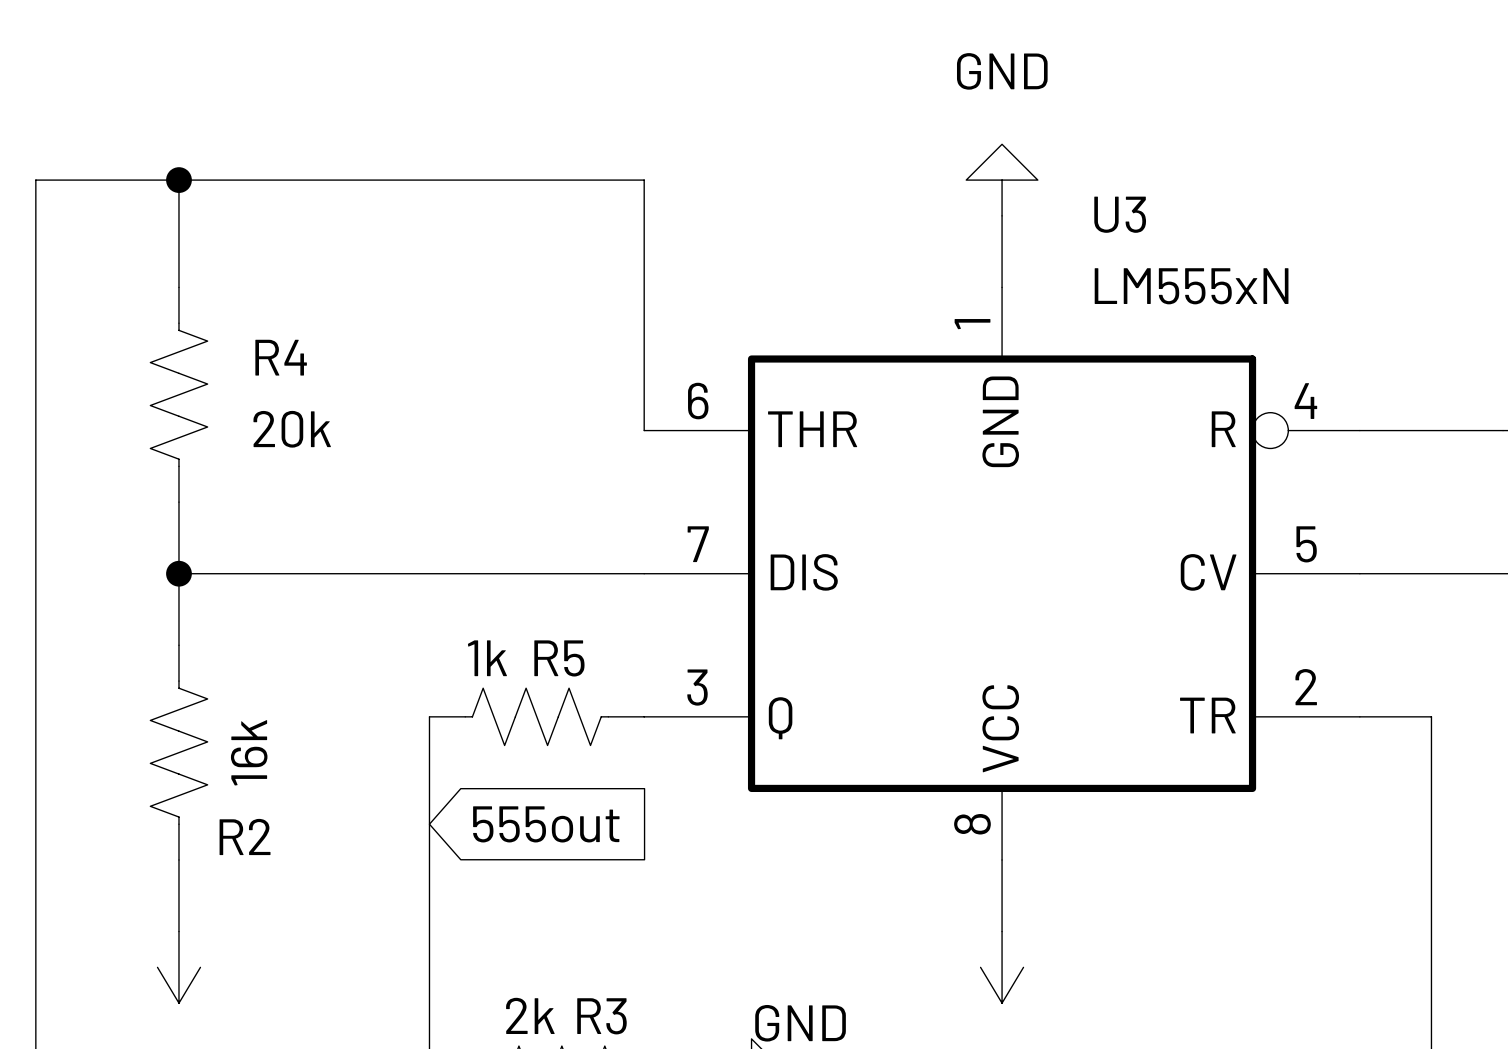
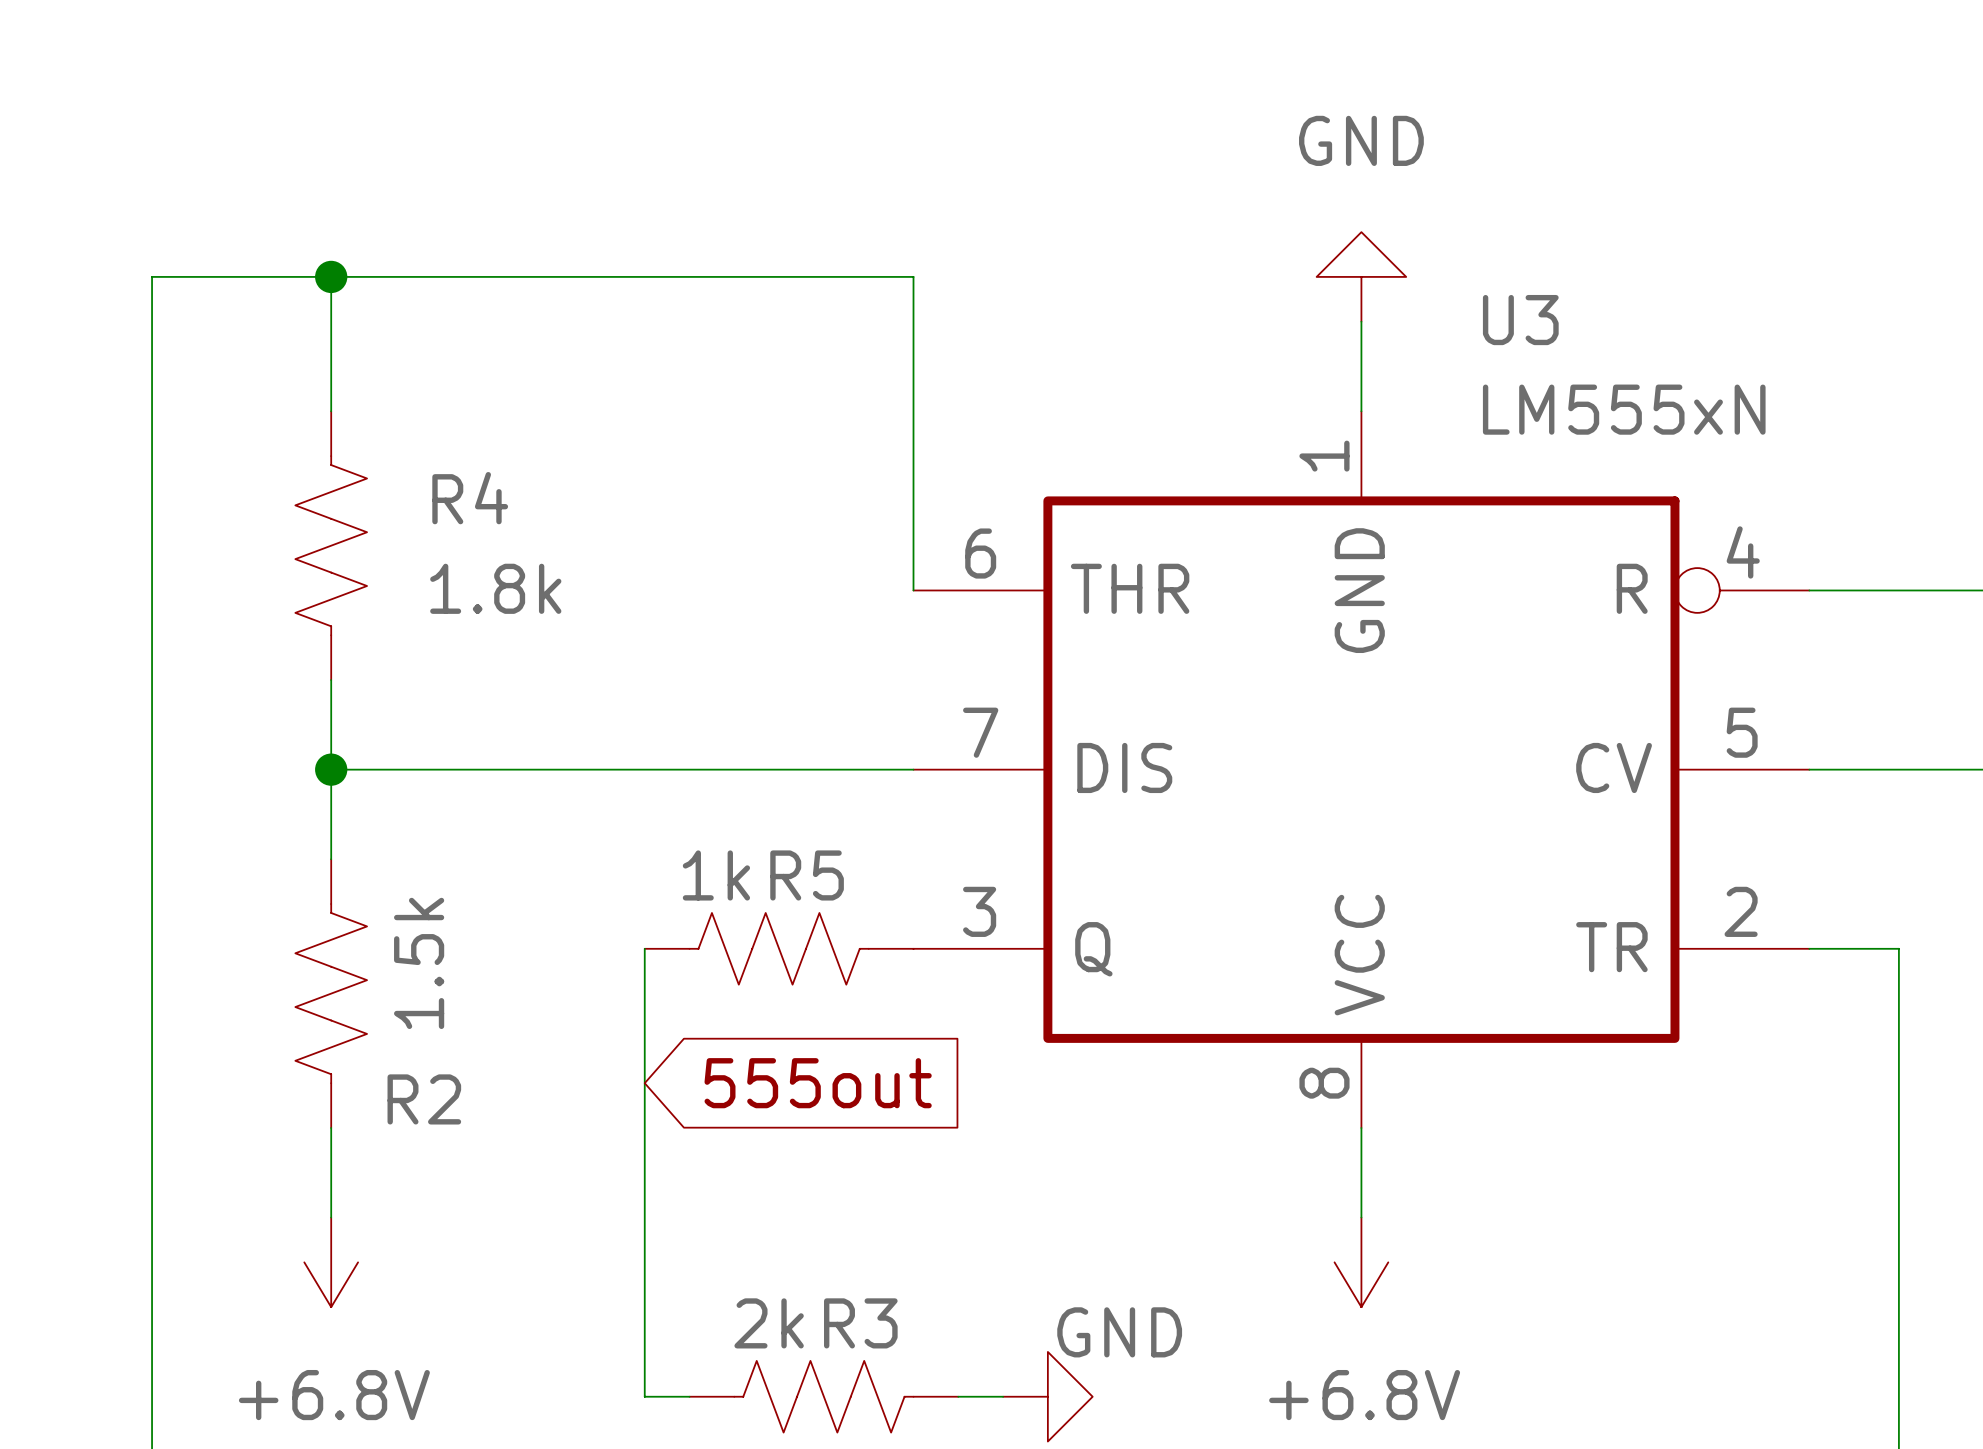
R4 value: 20k (292, 429) -> 1.8k (495, 588)
R2 value: 16k (249, 752) -> 1.5k (419, 963)

